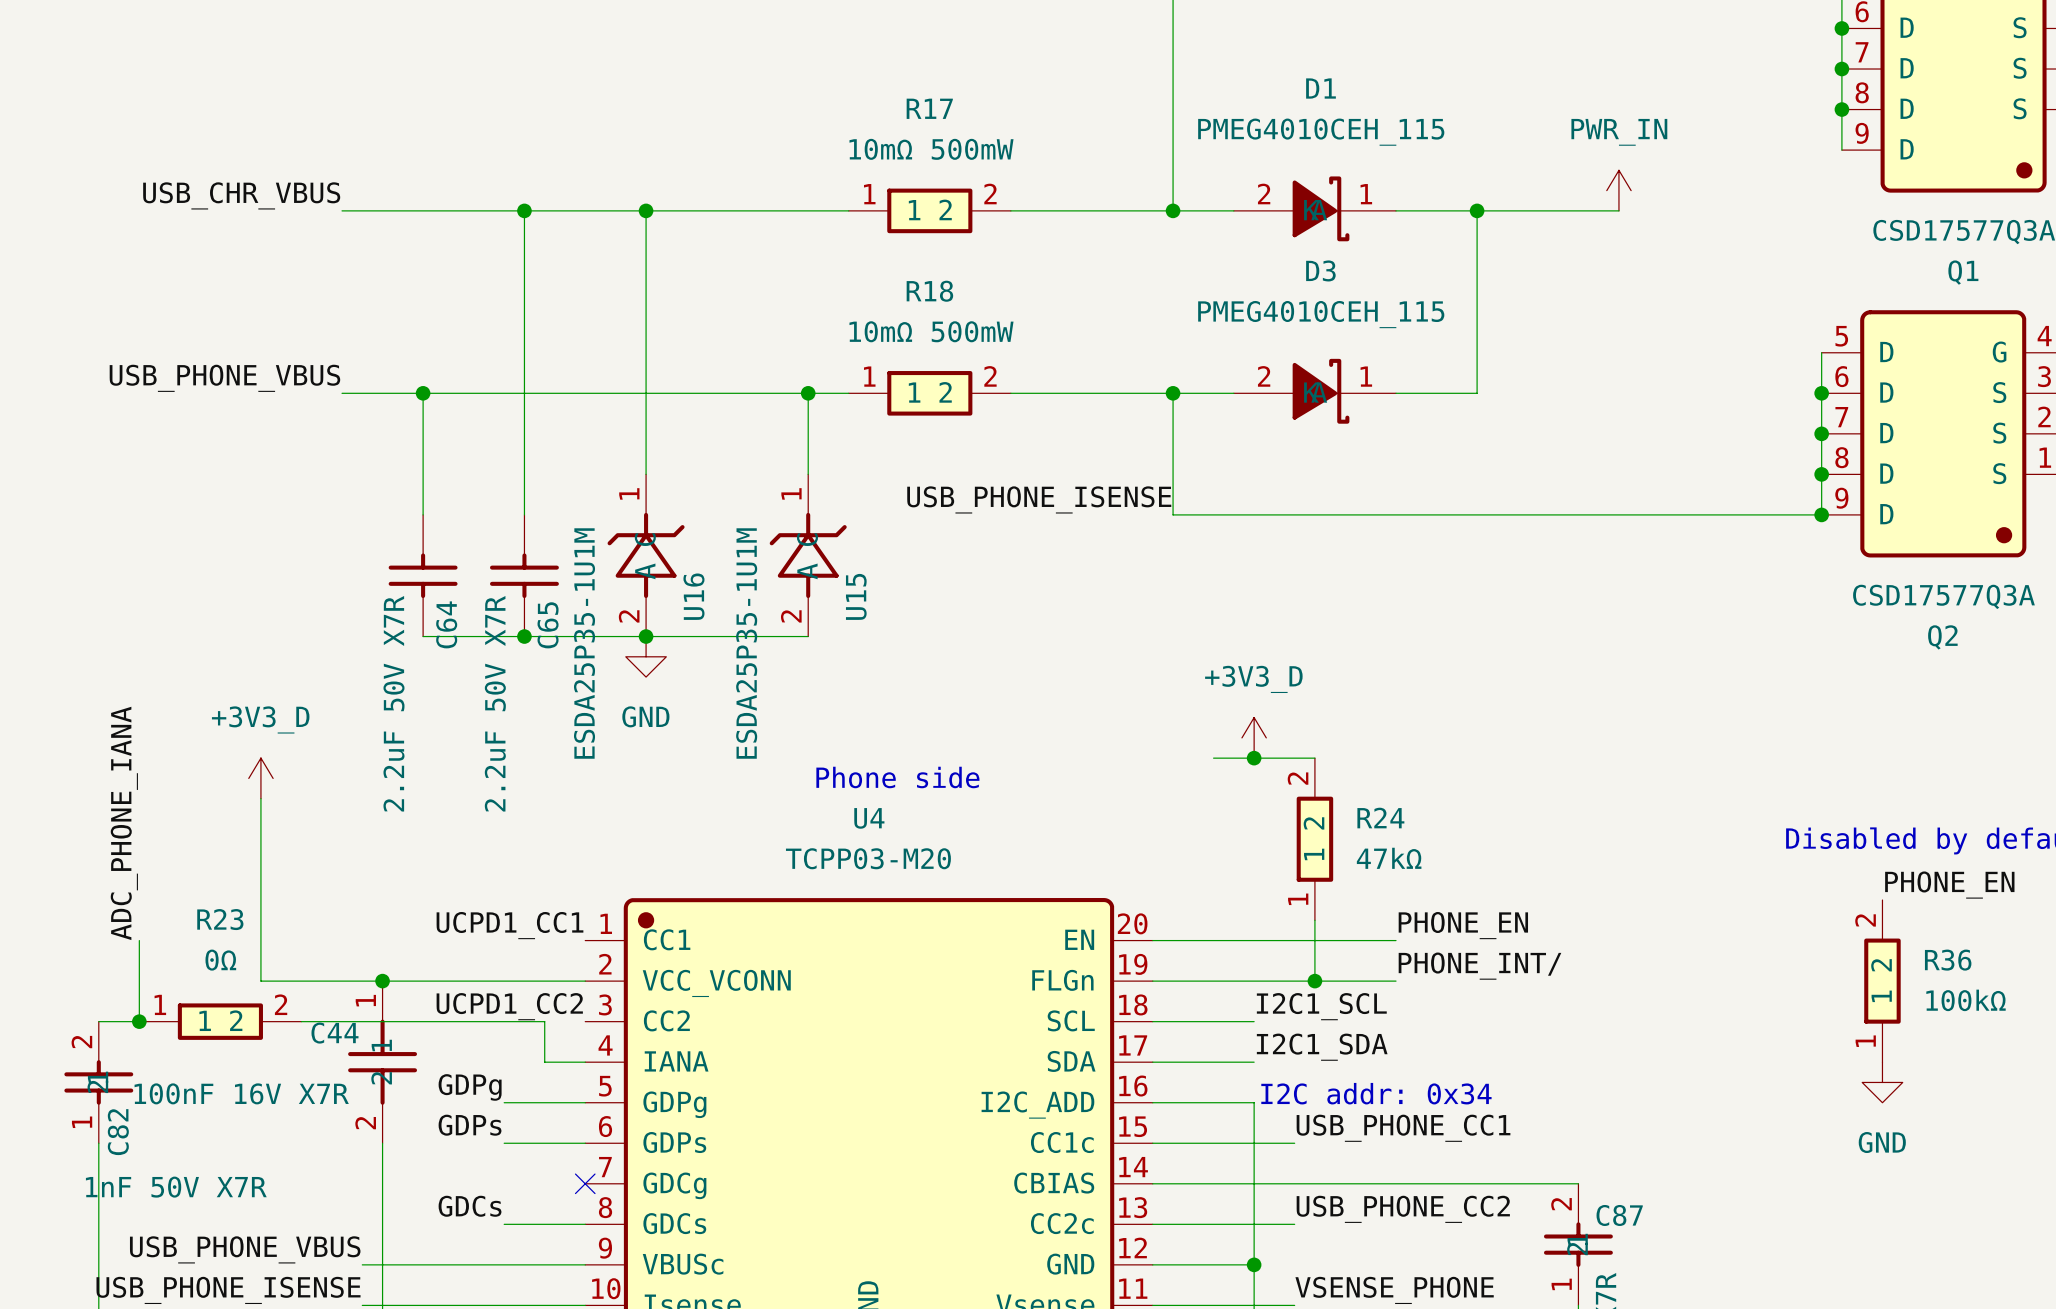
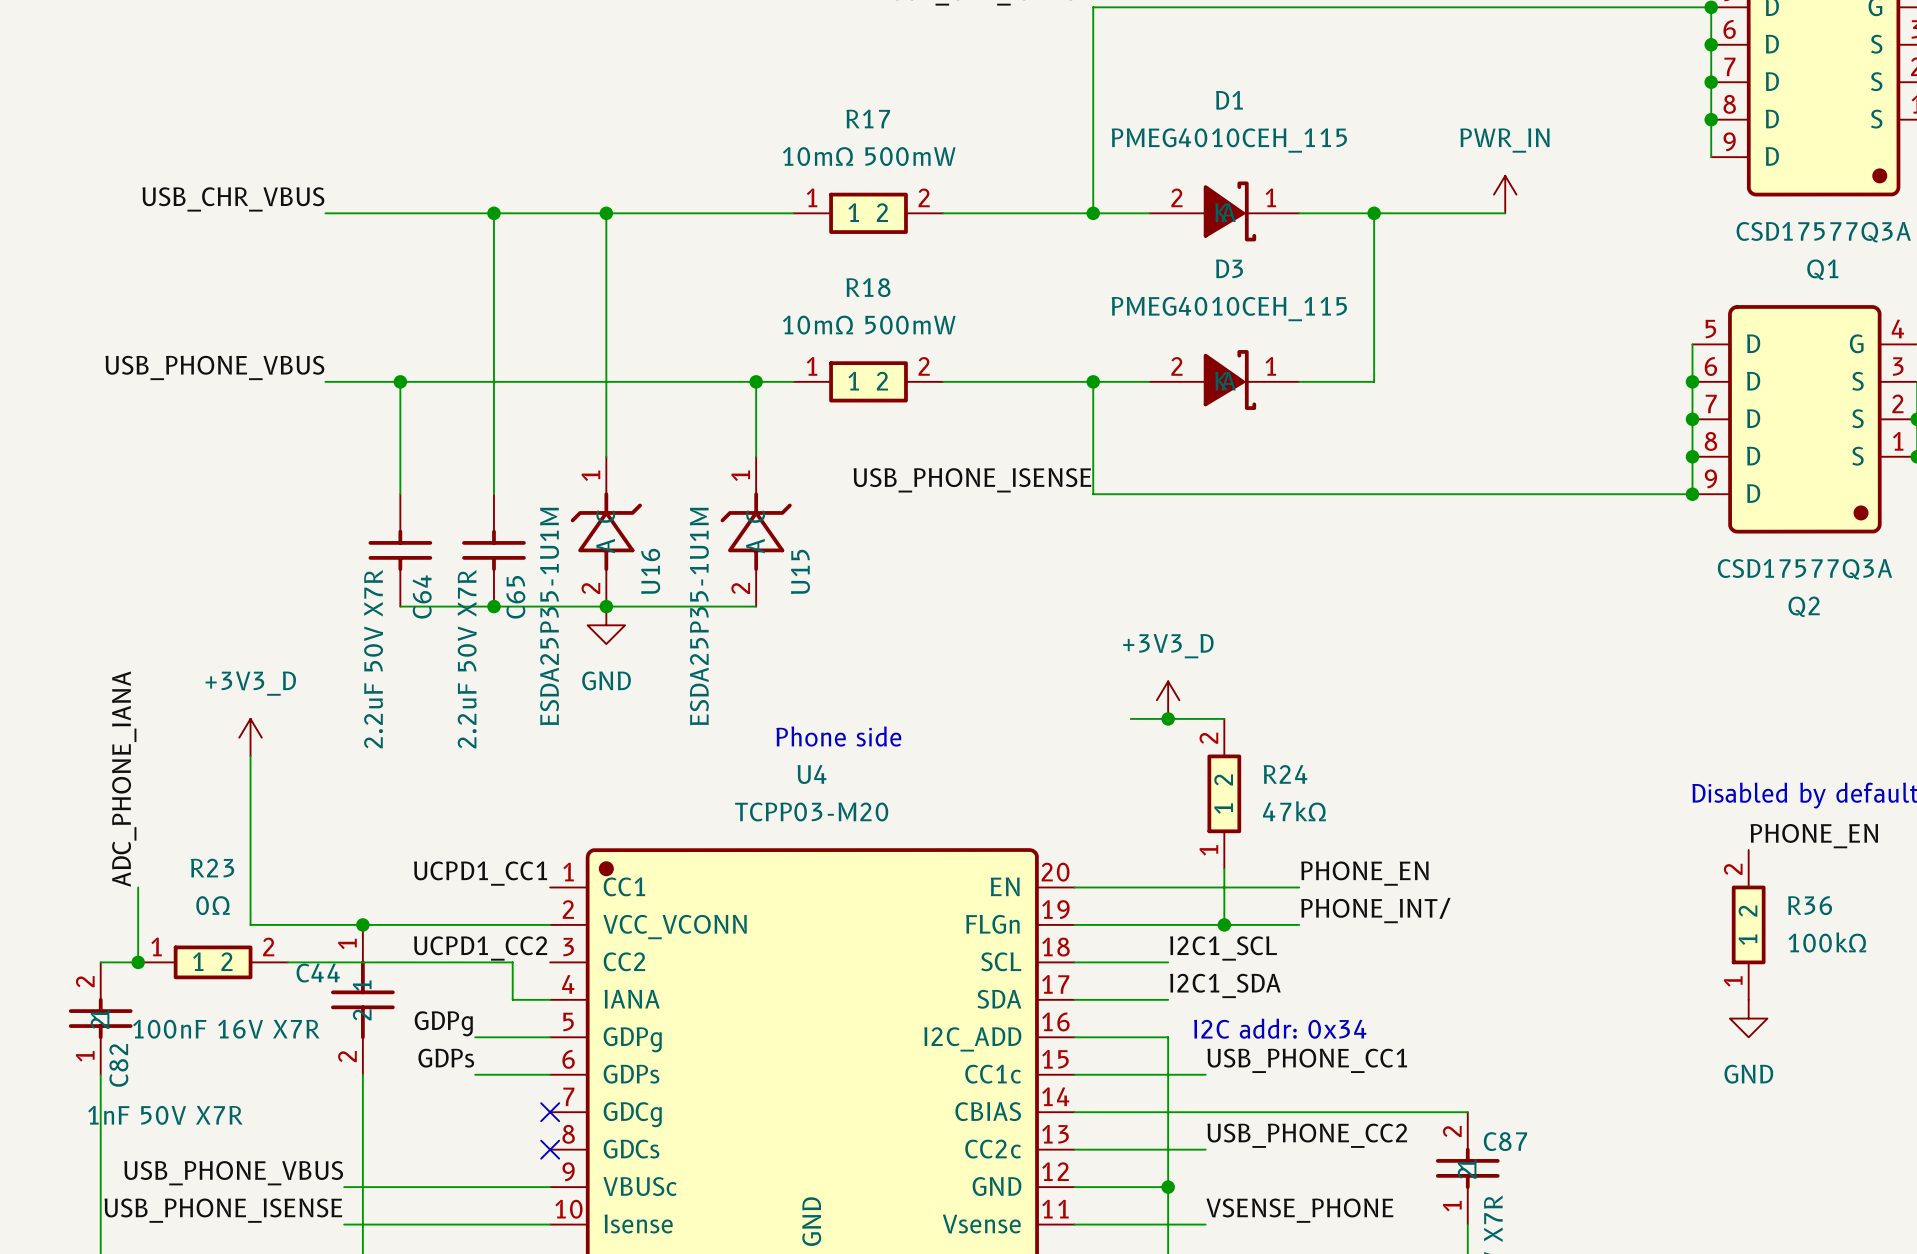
label: GDCs (470, 1206) -> none
wire: (504, 1224) (585, 1224) -> none
no-connect mark: none -> (550, 1149)

